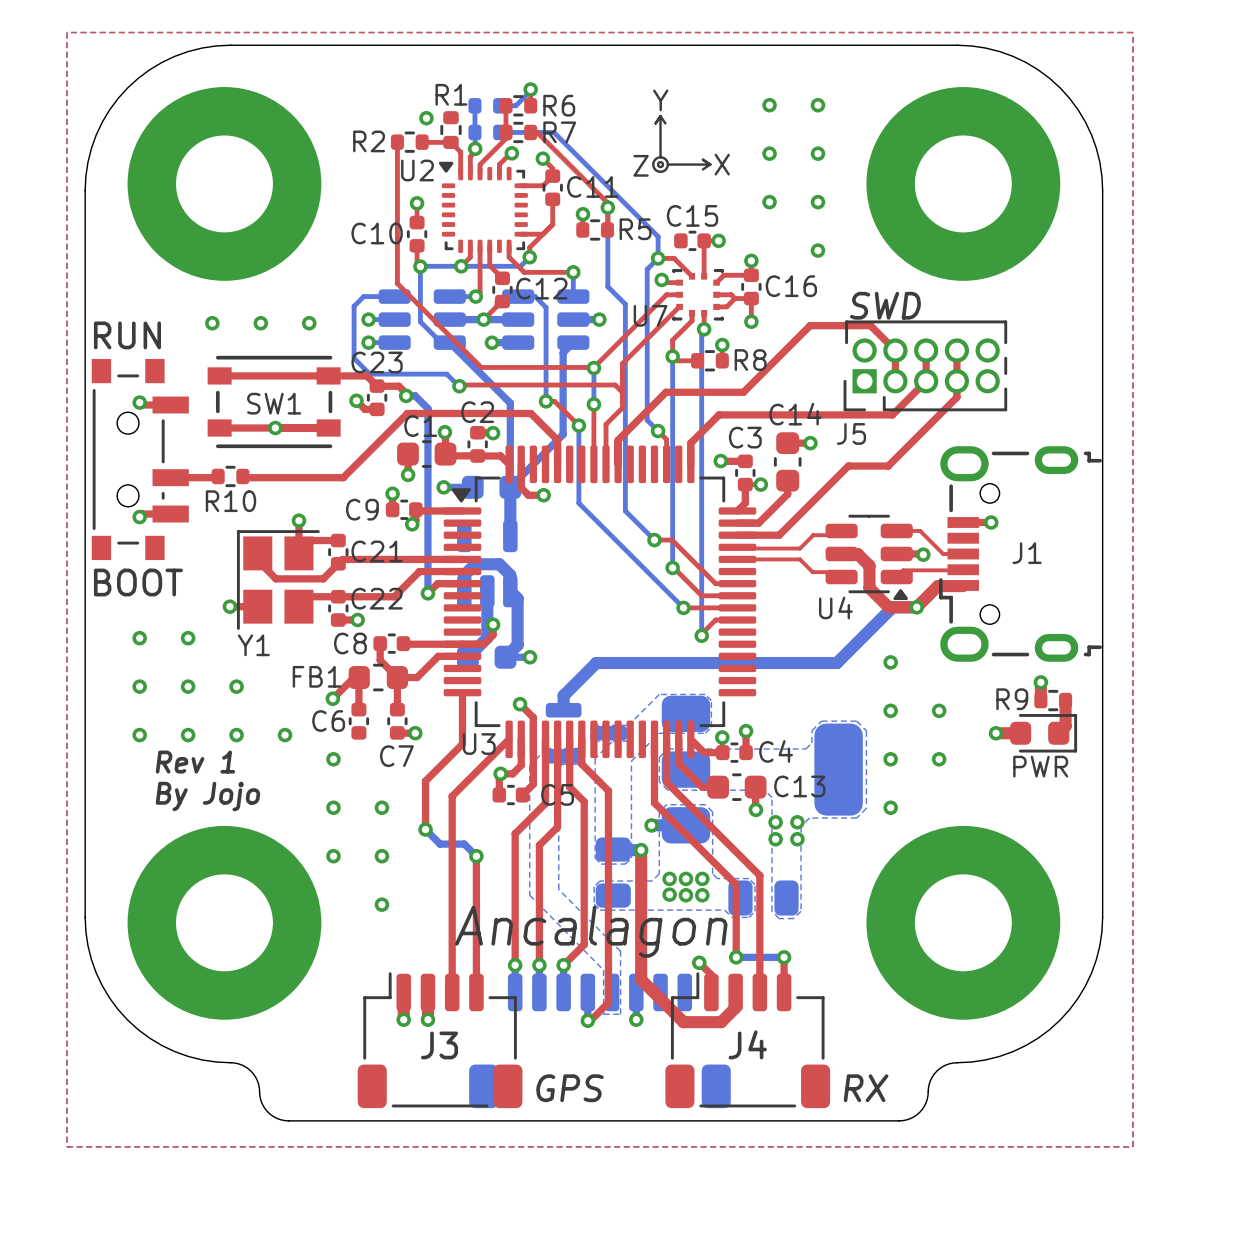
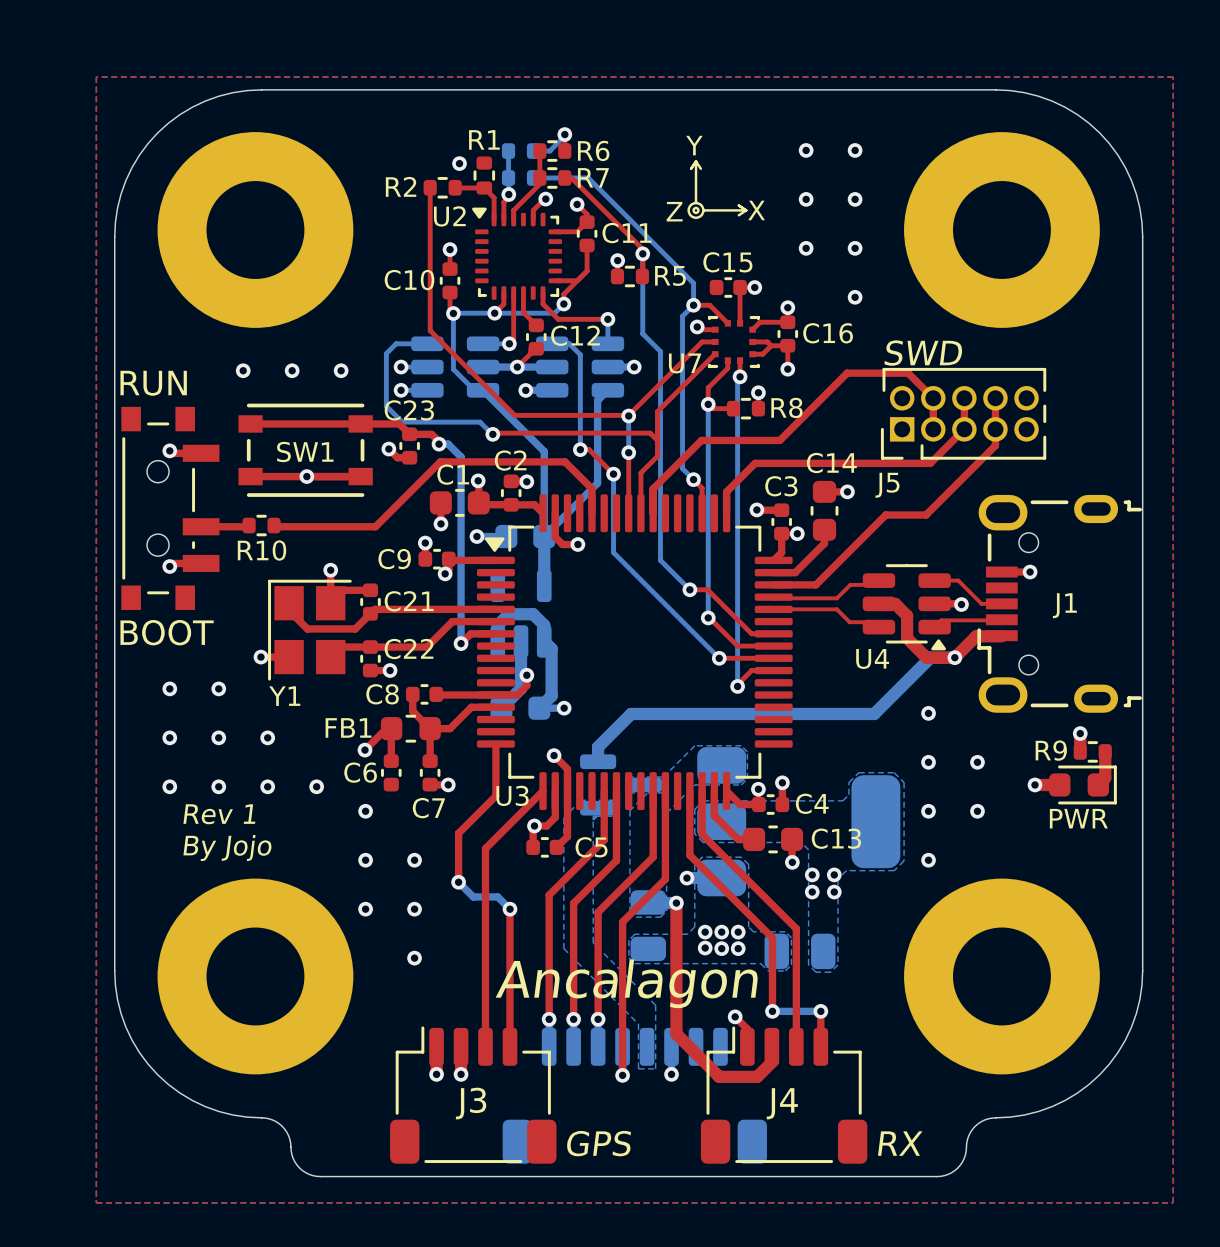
top track: (545, 739) (545, 803) (515, 833) (515, 842) -> (604, 839) (549, 895)
top track: (557, 739) (557, 827) (539, 845) (539, 850) -> (616, 816) (616, 860) (573, 903)
top track: none -> (665, 791) (665, 879) (622, 922) (622, 1075)
top track: (581, 764) (608, 790) (608, 1002) (590, 1020) -> none
top track: (569, 787) (584, 801) (584, 944) (563, 965) -> (653, 791) (653, 857) (598, 912) (598, 1019)

